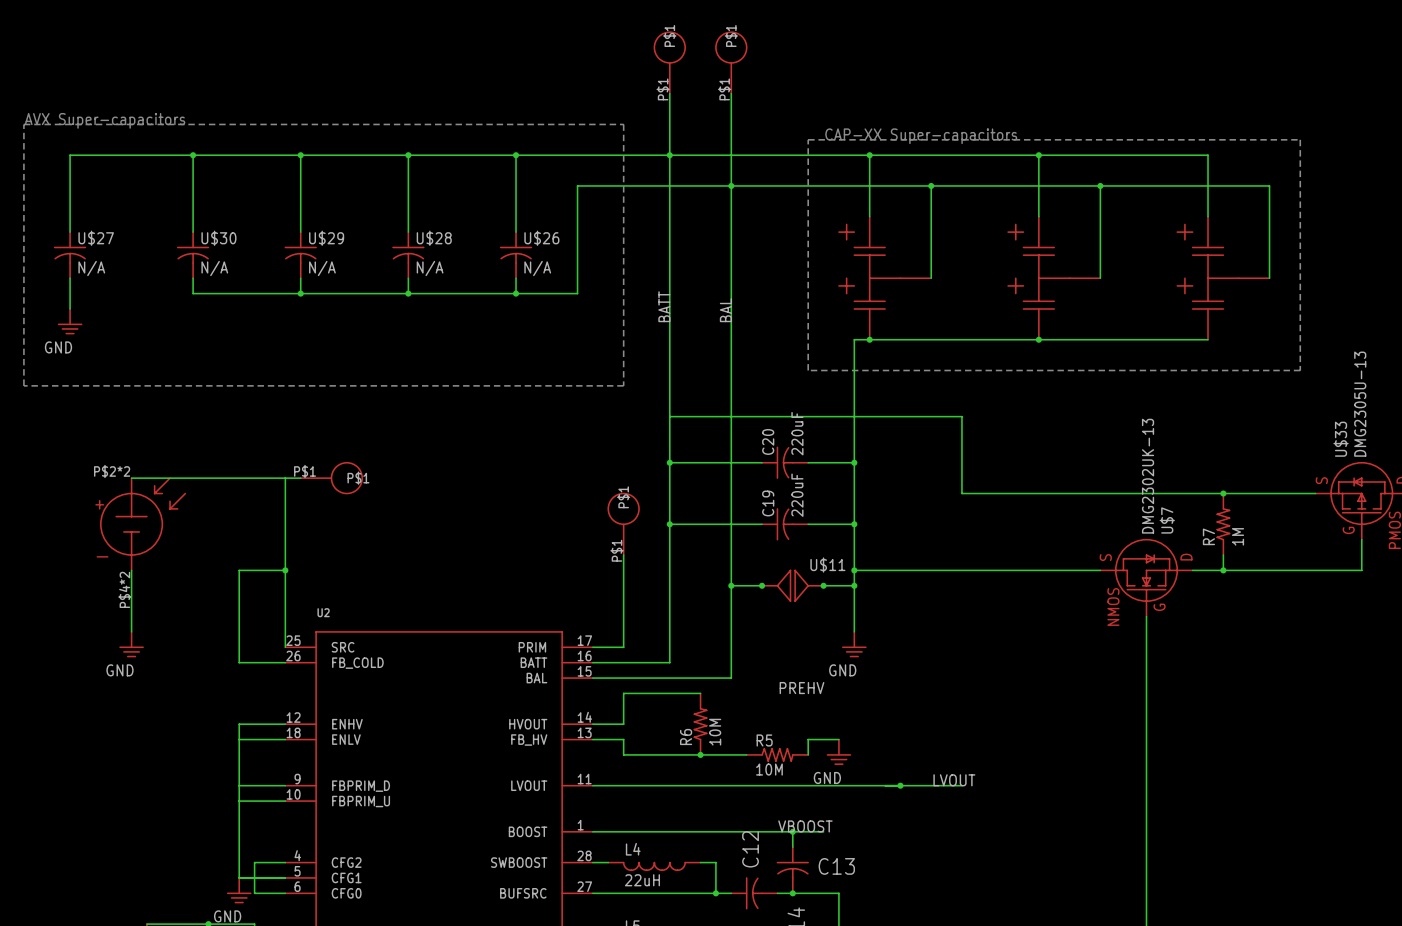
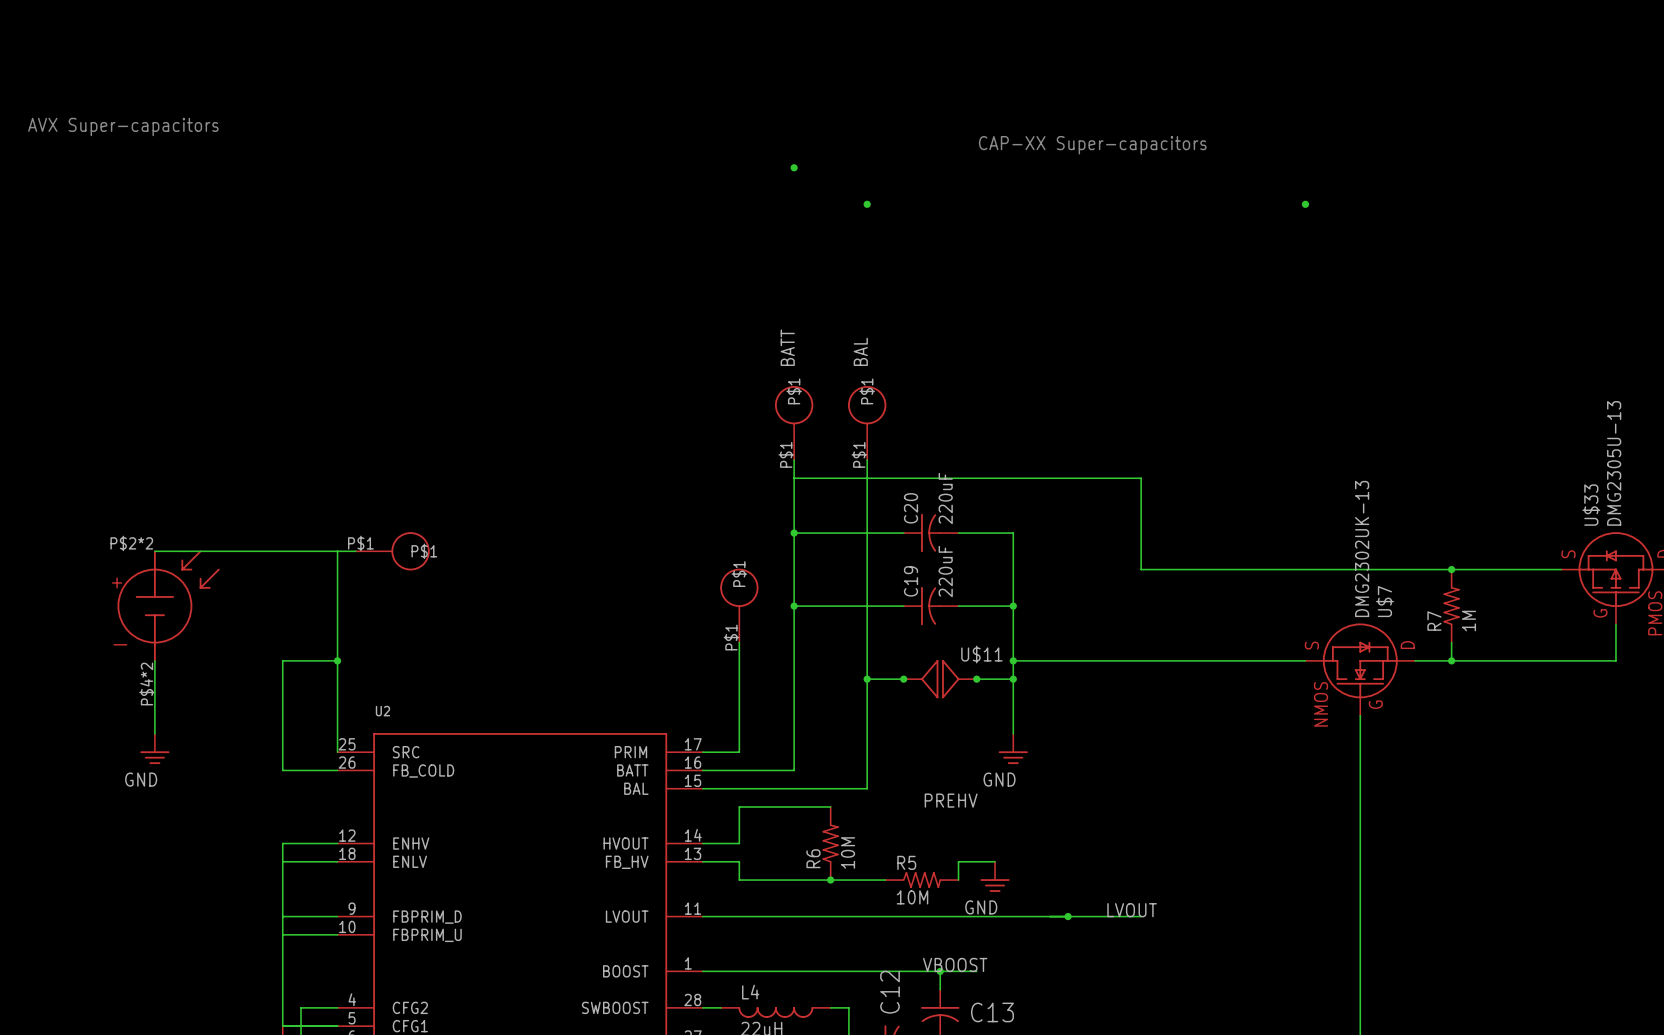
part: (669, 62) -> none
part: (731, 62) -> none
wire: (669, 93) (669, 401) -> none
wire: (731, 93) (731, 401) -> none
line: (23, 124) (623, 124) (623, 385) (23, 385) (23, 124) -> none
line: (808, 139) (1300, 139) (1300, 370) (808, 370) (808, 139) -> none
wire: (193, 155) (193, 232) -> none
junction: (193, 155) -> none
wire: (300, 155) (300, 232) -> none
junction: (300, 155) -> none
wire: (408, 155) (408, 232) -> none
junction: (408, 155) -> none
wire: (516, 155) (516, 232) -> none
junction: (516, 155) -> none
wire: (869, 155) (869, 216) -> none
junction: (869, 155) -> none
wire: (1038, 155) (1038, 216) -> none
junction: (1038, 155) -> none
wire: (931, 185) (931, 278) -> none
junction: (931, 185) -> none
wire: (1100, 185) (1100, 278) -> none
wire: (1208, 216) (1208, 155) (70, 155) (70, 232) -> none
U$27: N/A (70, 255) -> none
U$30: N/A (193, 255) -> none
U$29: N/A (300, 255) -> none
U$28: N/A (408, 255) -> none
U$26: N/A (516, 255) -> none
wire: (70, 278) (70, 308) -> none
wire: (193, 278) (193, 293) (577, 293) (577, 185) (1269, 185) (1269, 278) -> none
wire: (300, 278) (300, 293) -> none
wire: (408, 278) (408, 293) -> none
wire: (516, 278) (516, 293) -> none
part: (884, 278) -> none
part: (1053, 278) -> none
part: (1223, 278) -> none
junction: (300, 293) -> none
junction: (408, 293) -> none
junction: (516, 293) -> none
power symbol: GND (70, 321) -> none
junction: (869, 339) -> none
junction: (1038, 339) -> none
wire: (1208, 339) (854, 339) (854, 462) -> none
part: none -> (794, 423)
part: none -> (867, 423)
junction: (854, 462) -> none

